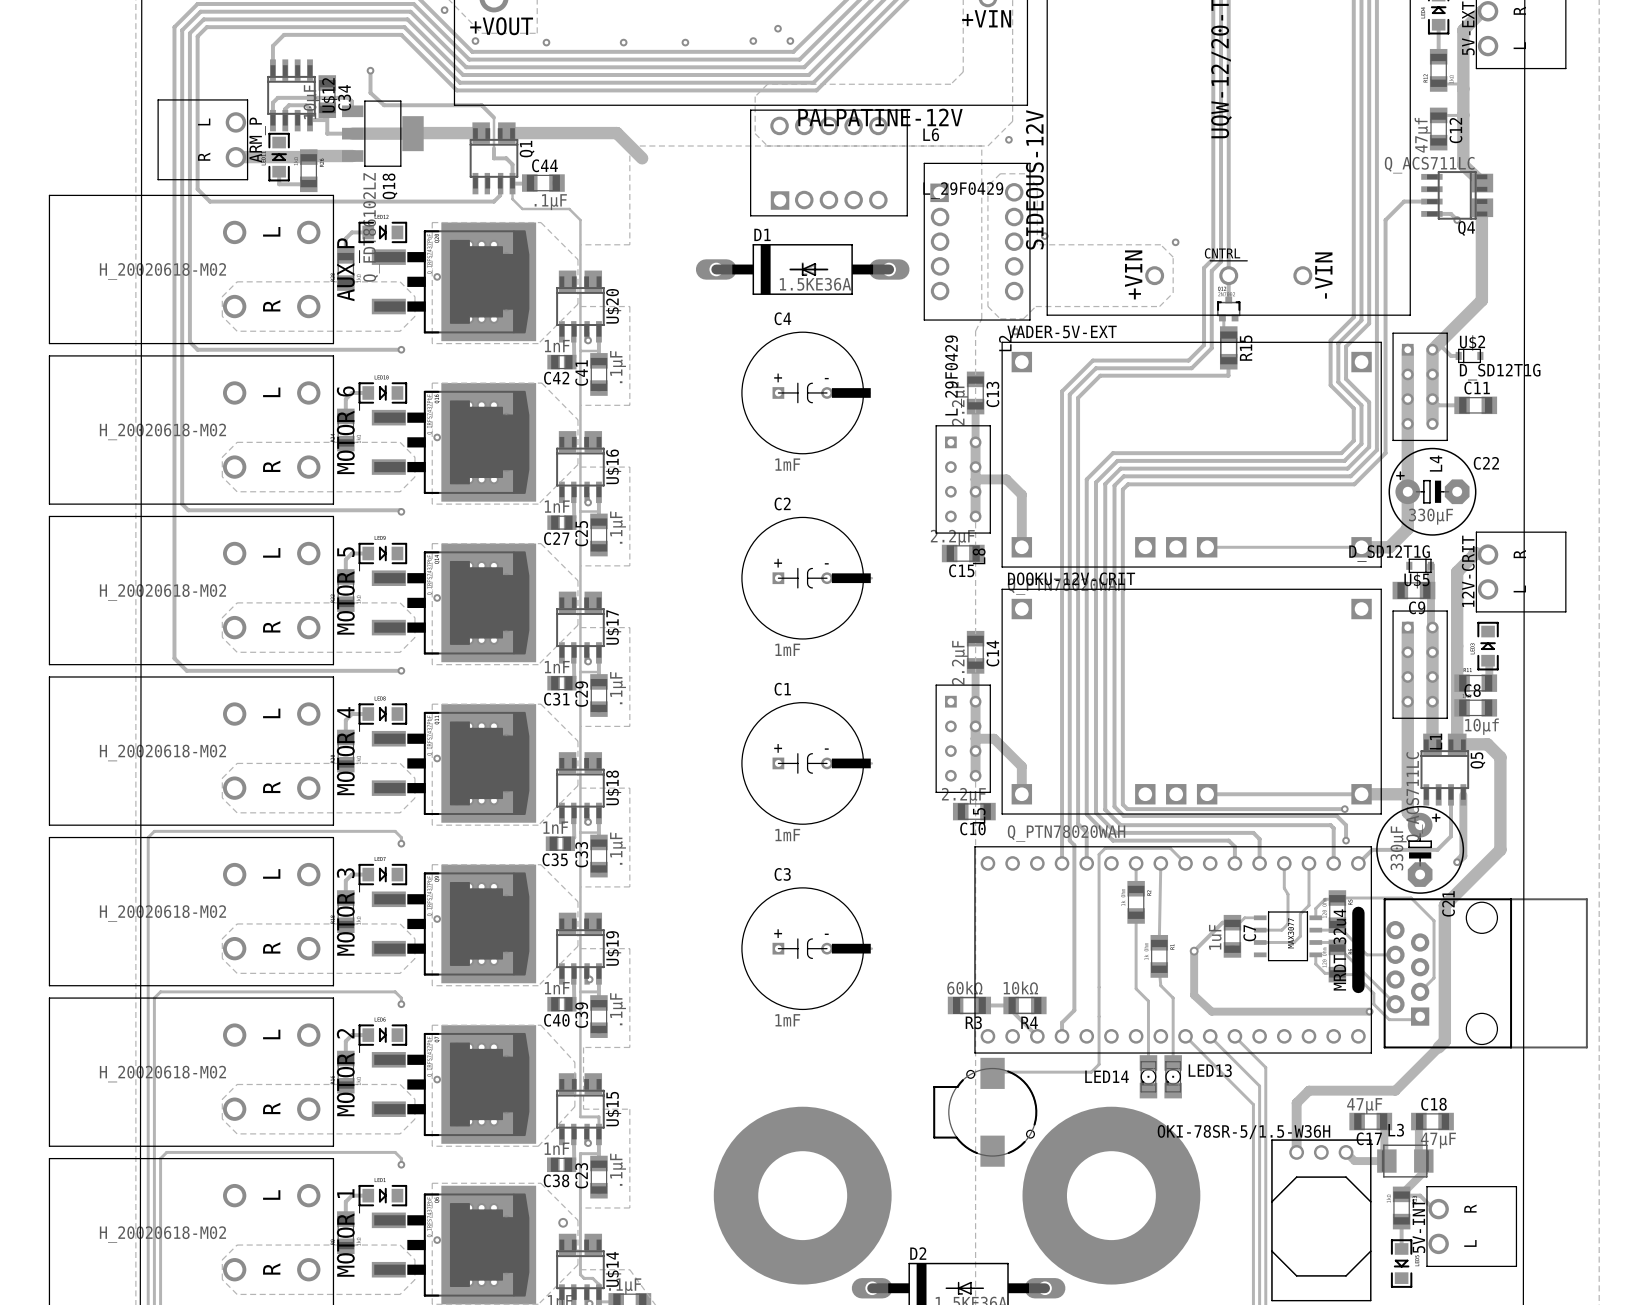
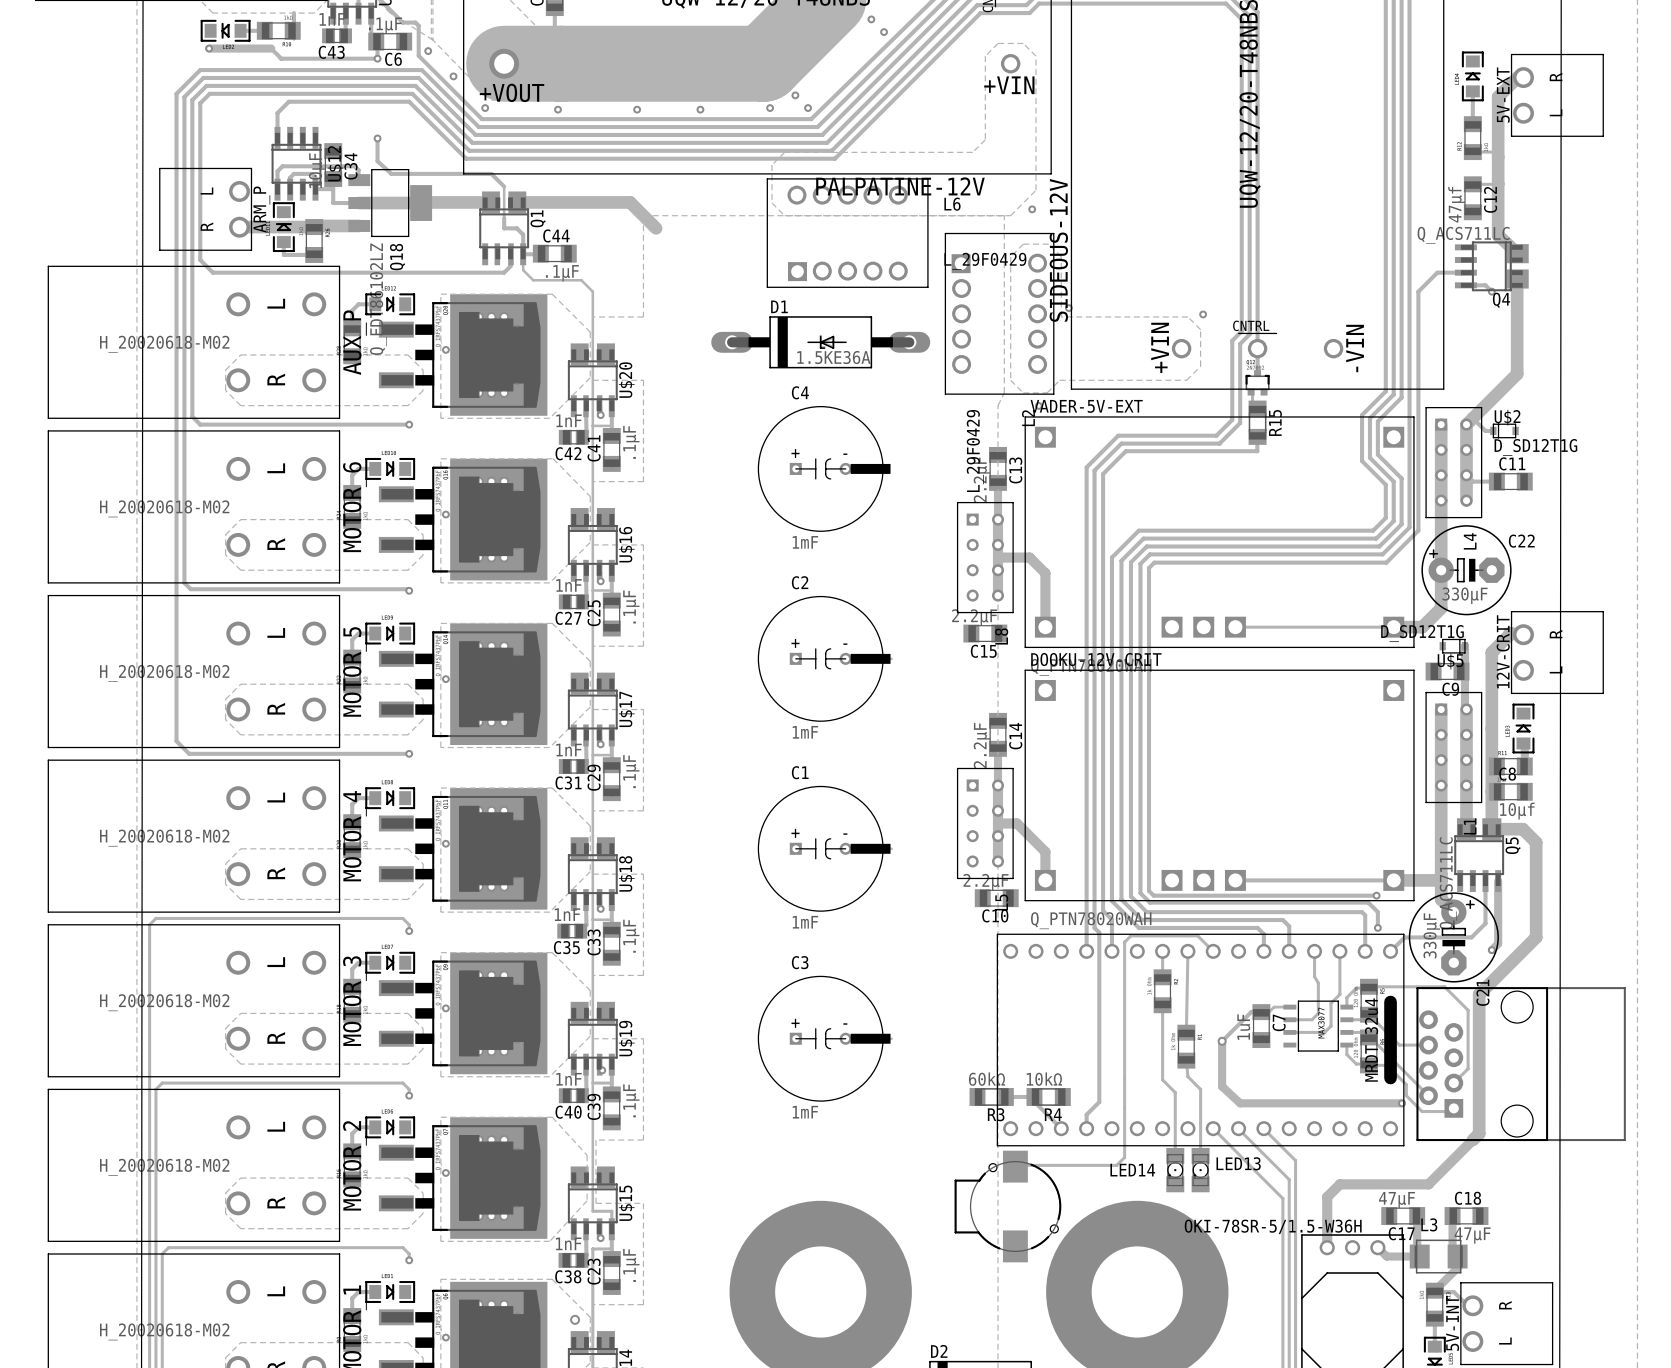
track: (790, 269) (827, 269) -> none

